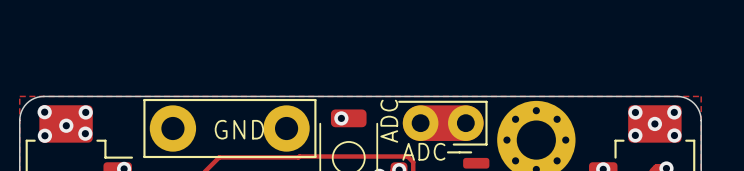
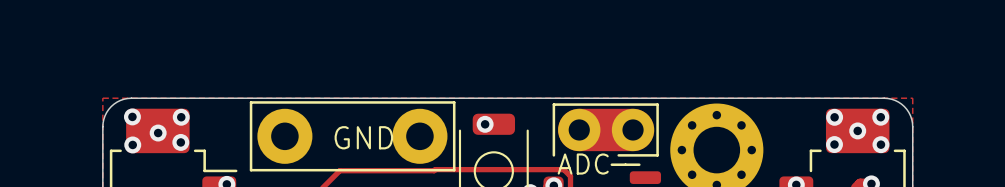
part footprint: [398, 100, 488, 146] -> [552, 103, 659, 157]
text: ADC (389, 121) -> none

